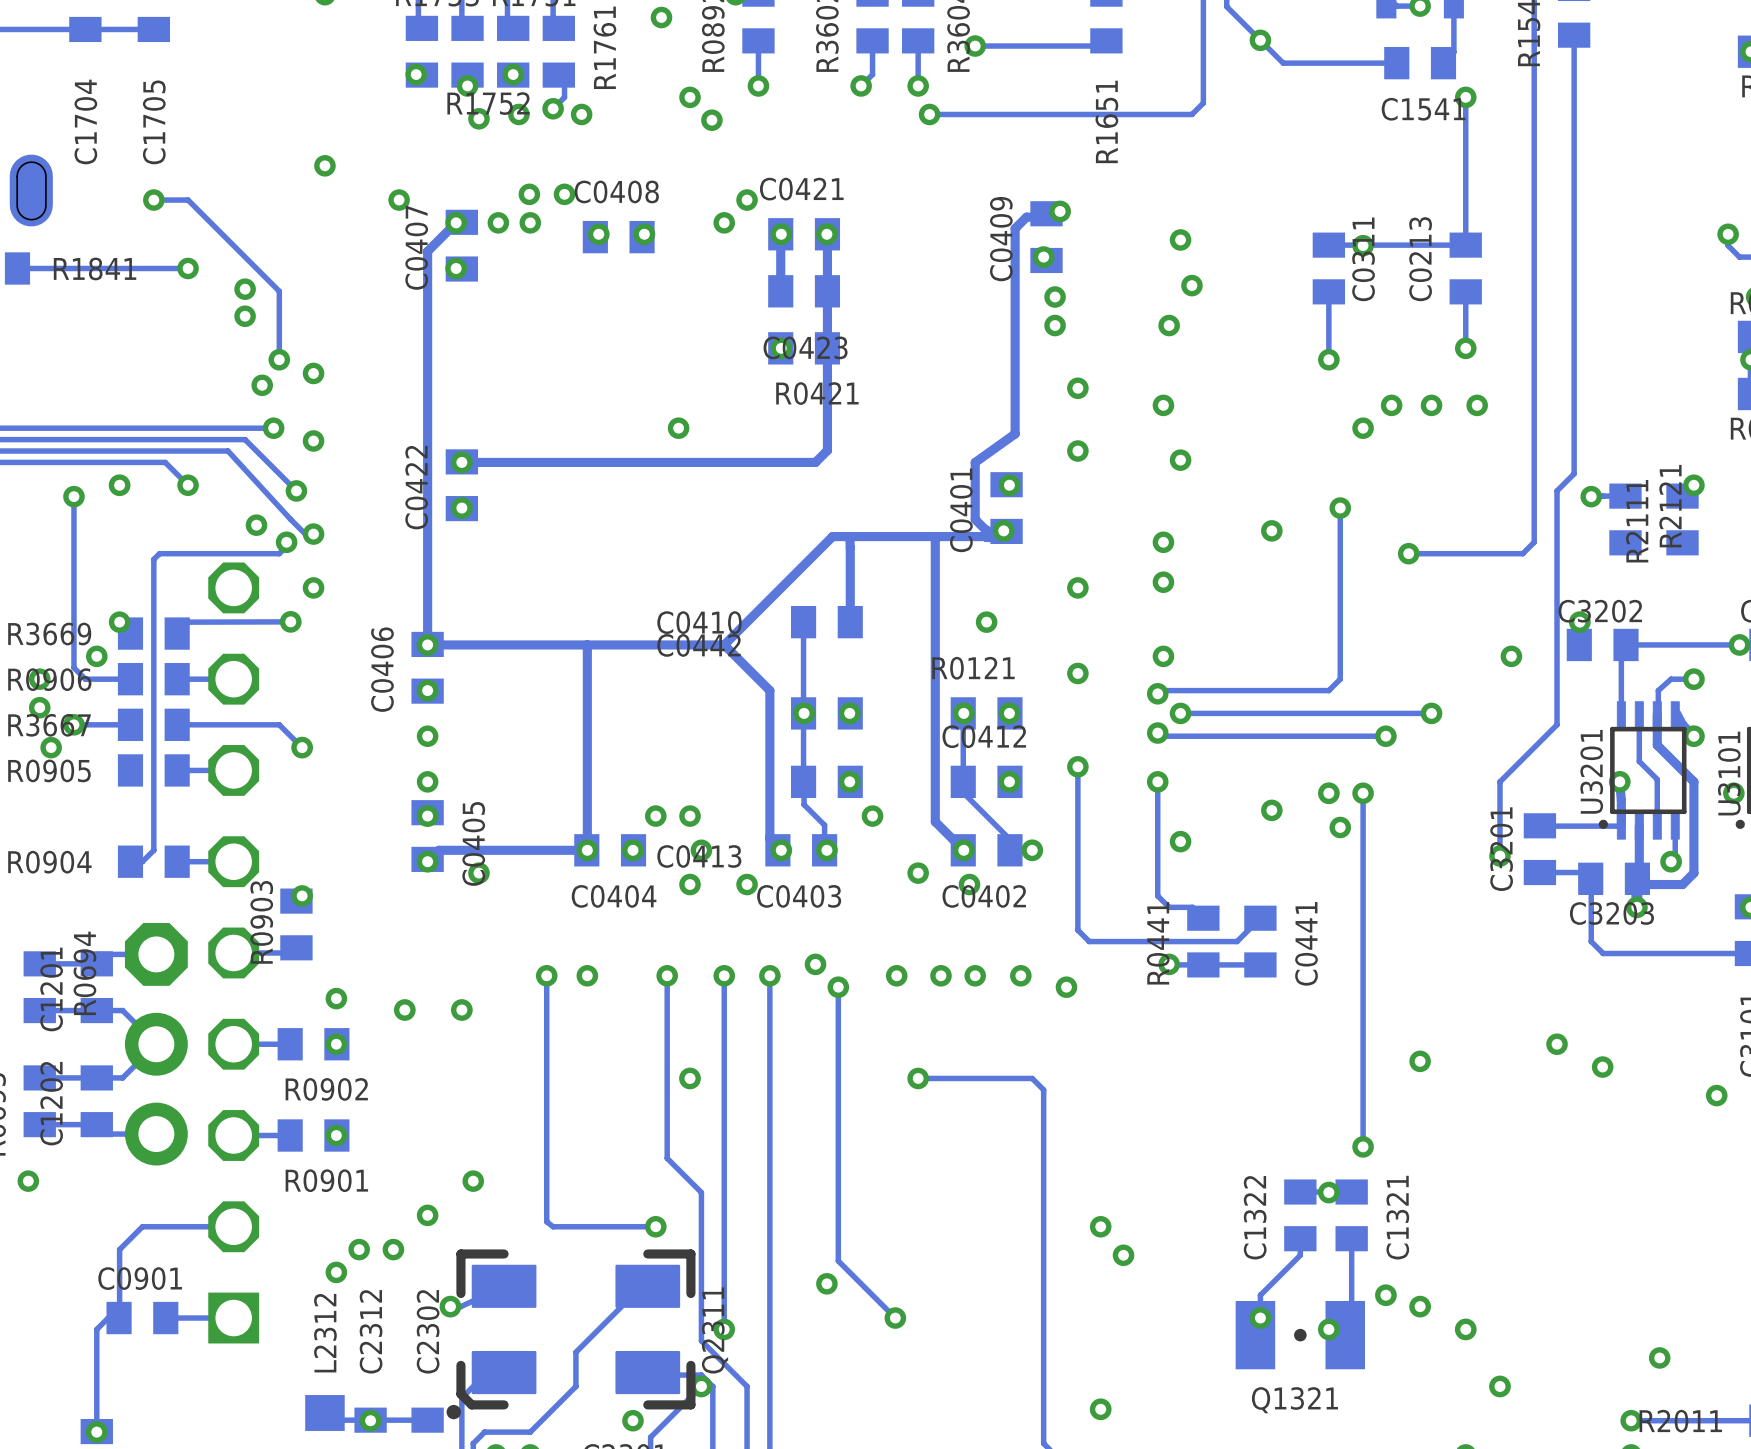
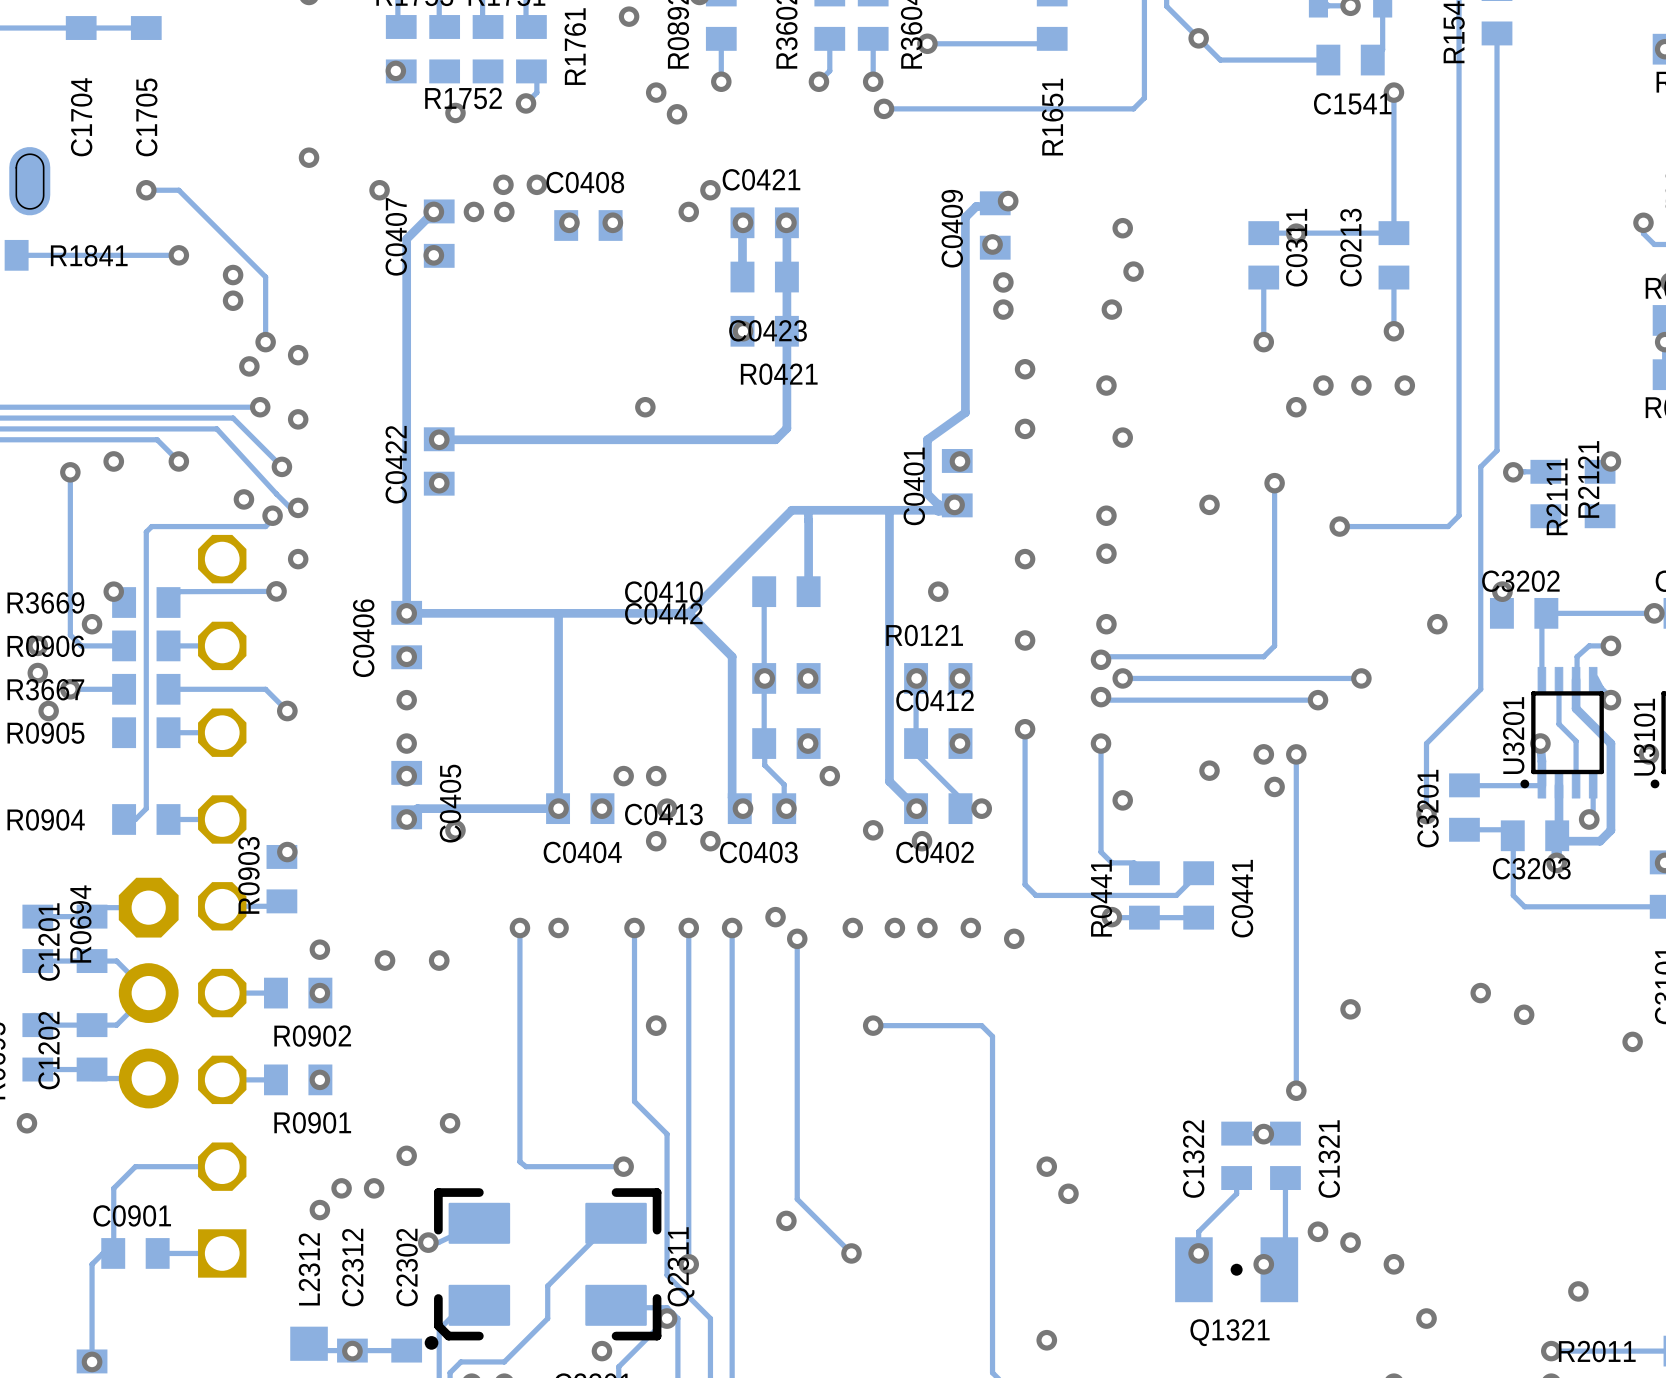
via: (513, 74) -> none
via: (467, 85) -> none
via: (518, 114) -> none
via: (581, 114) -> none

